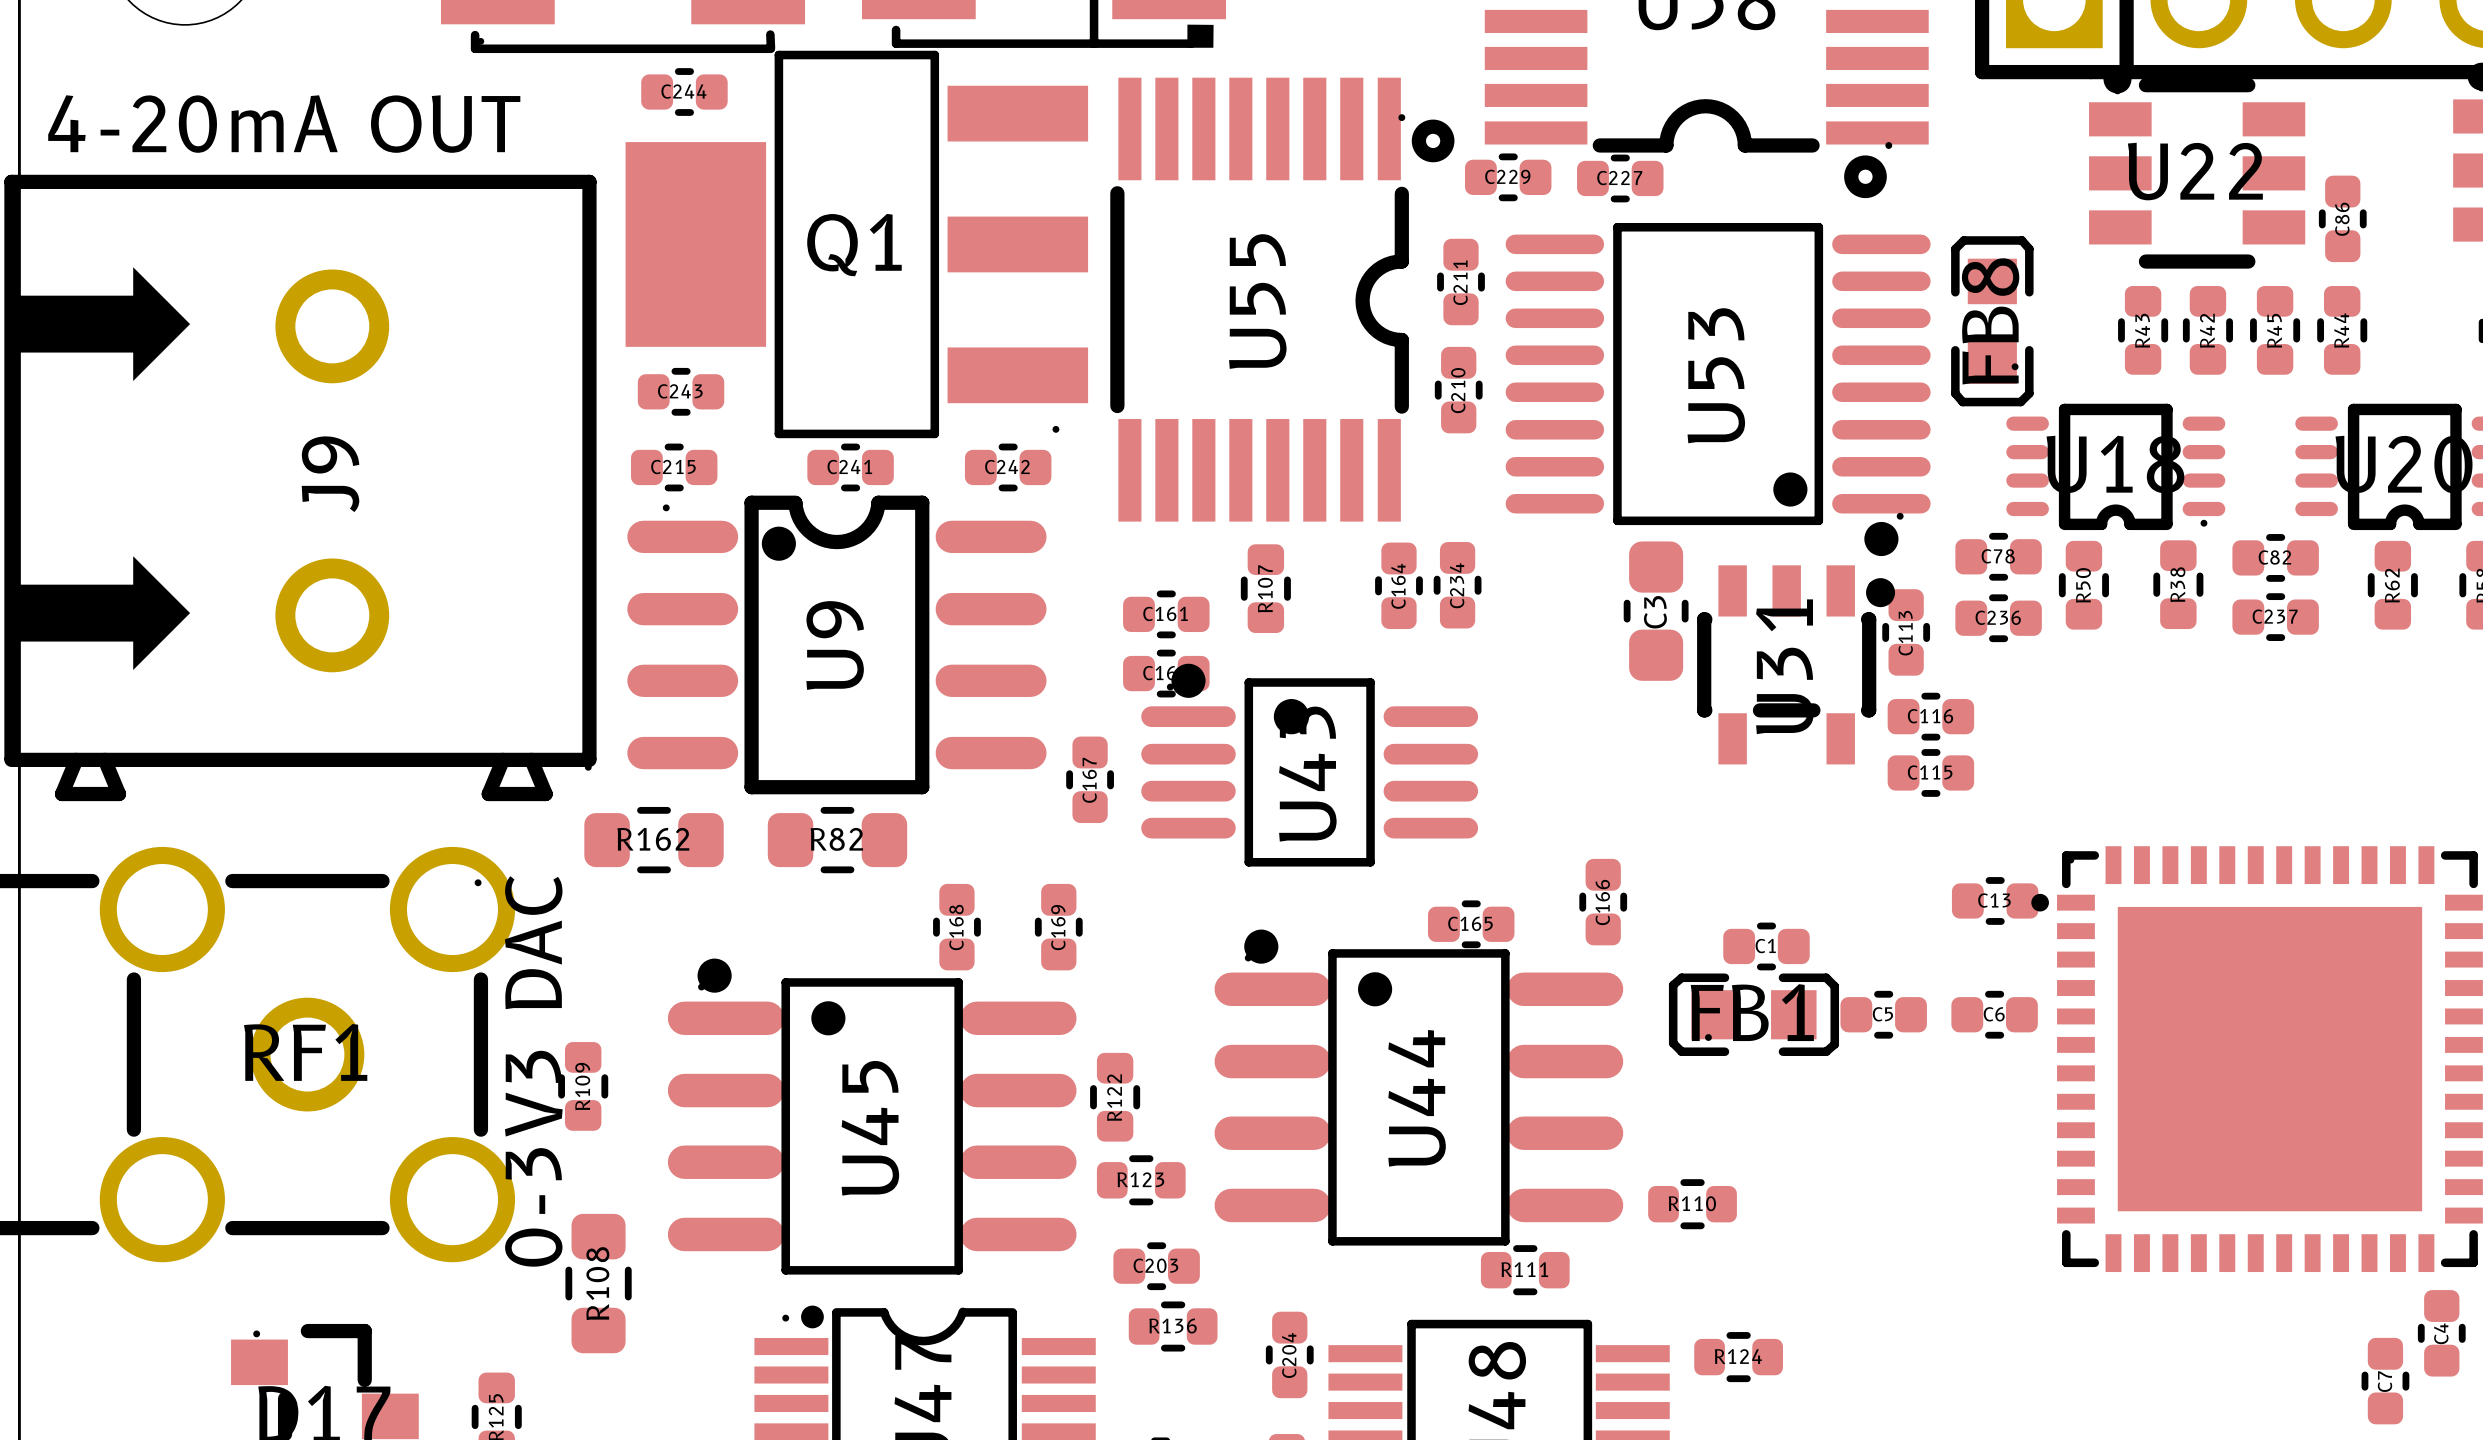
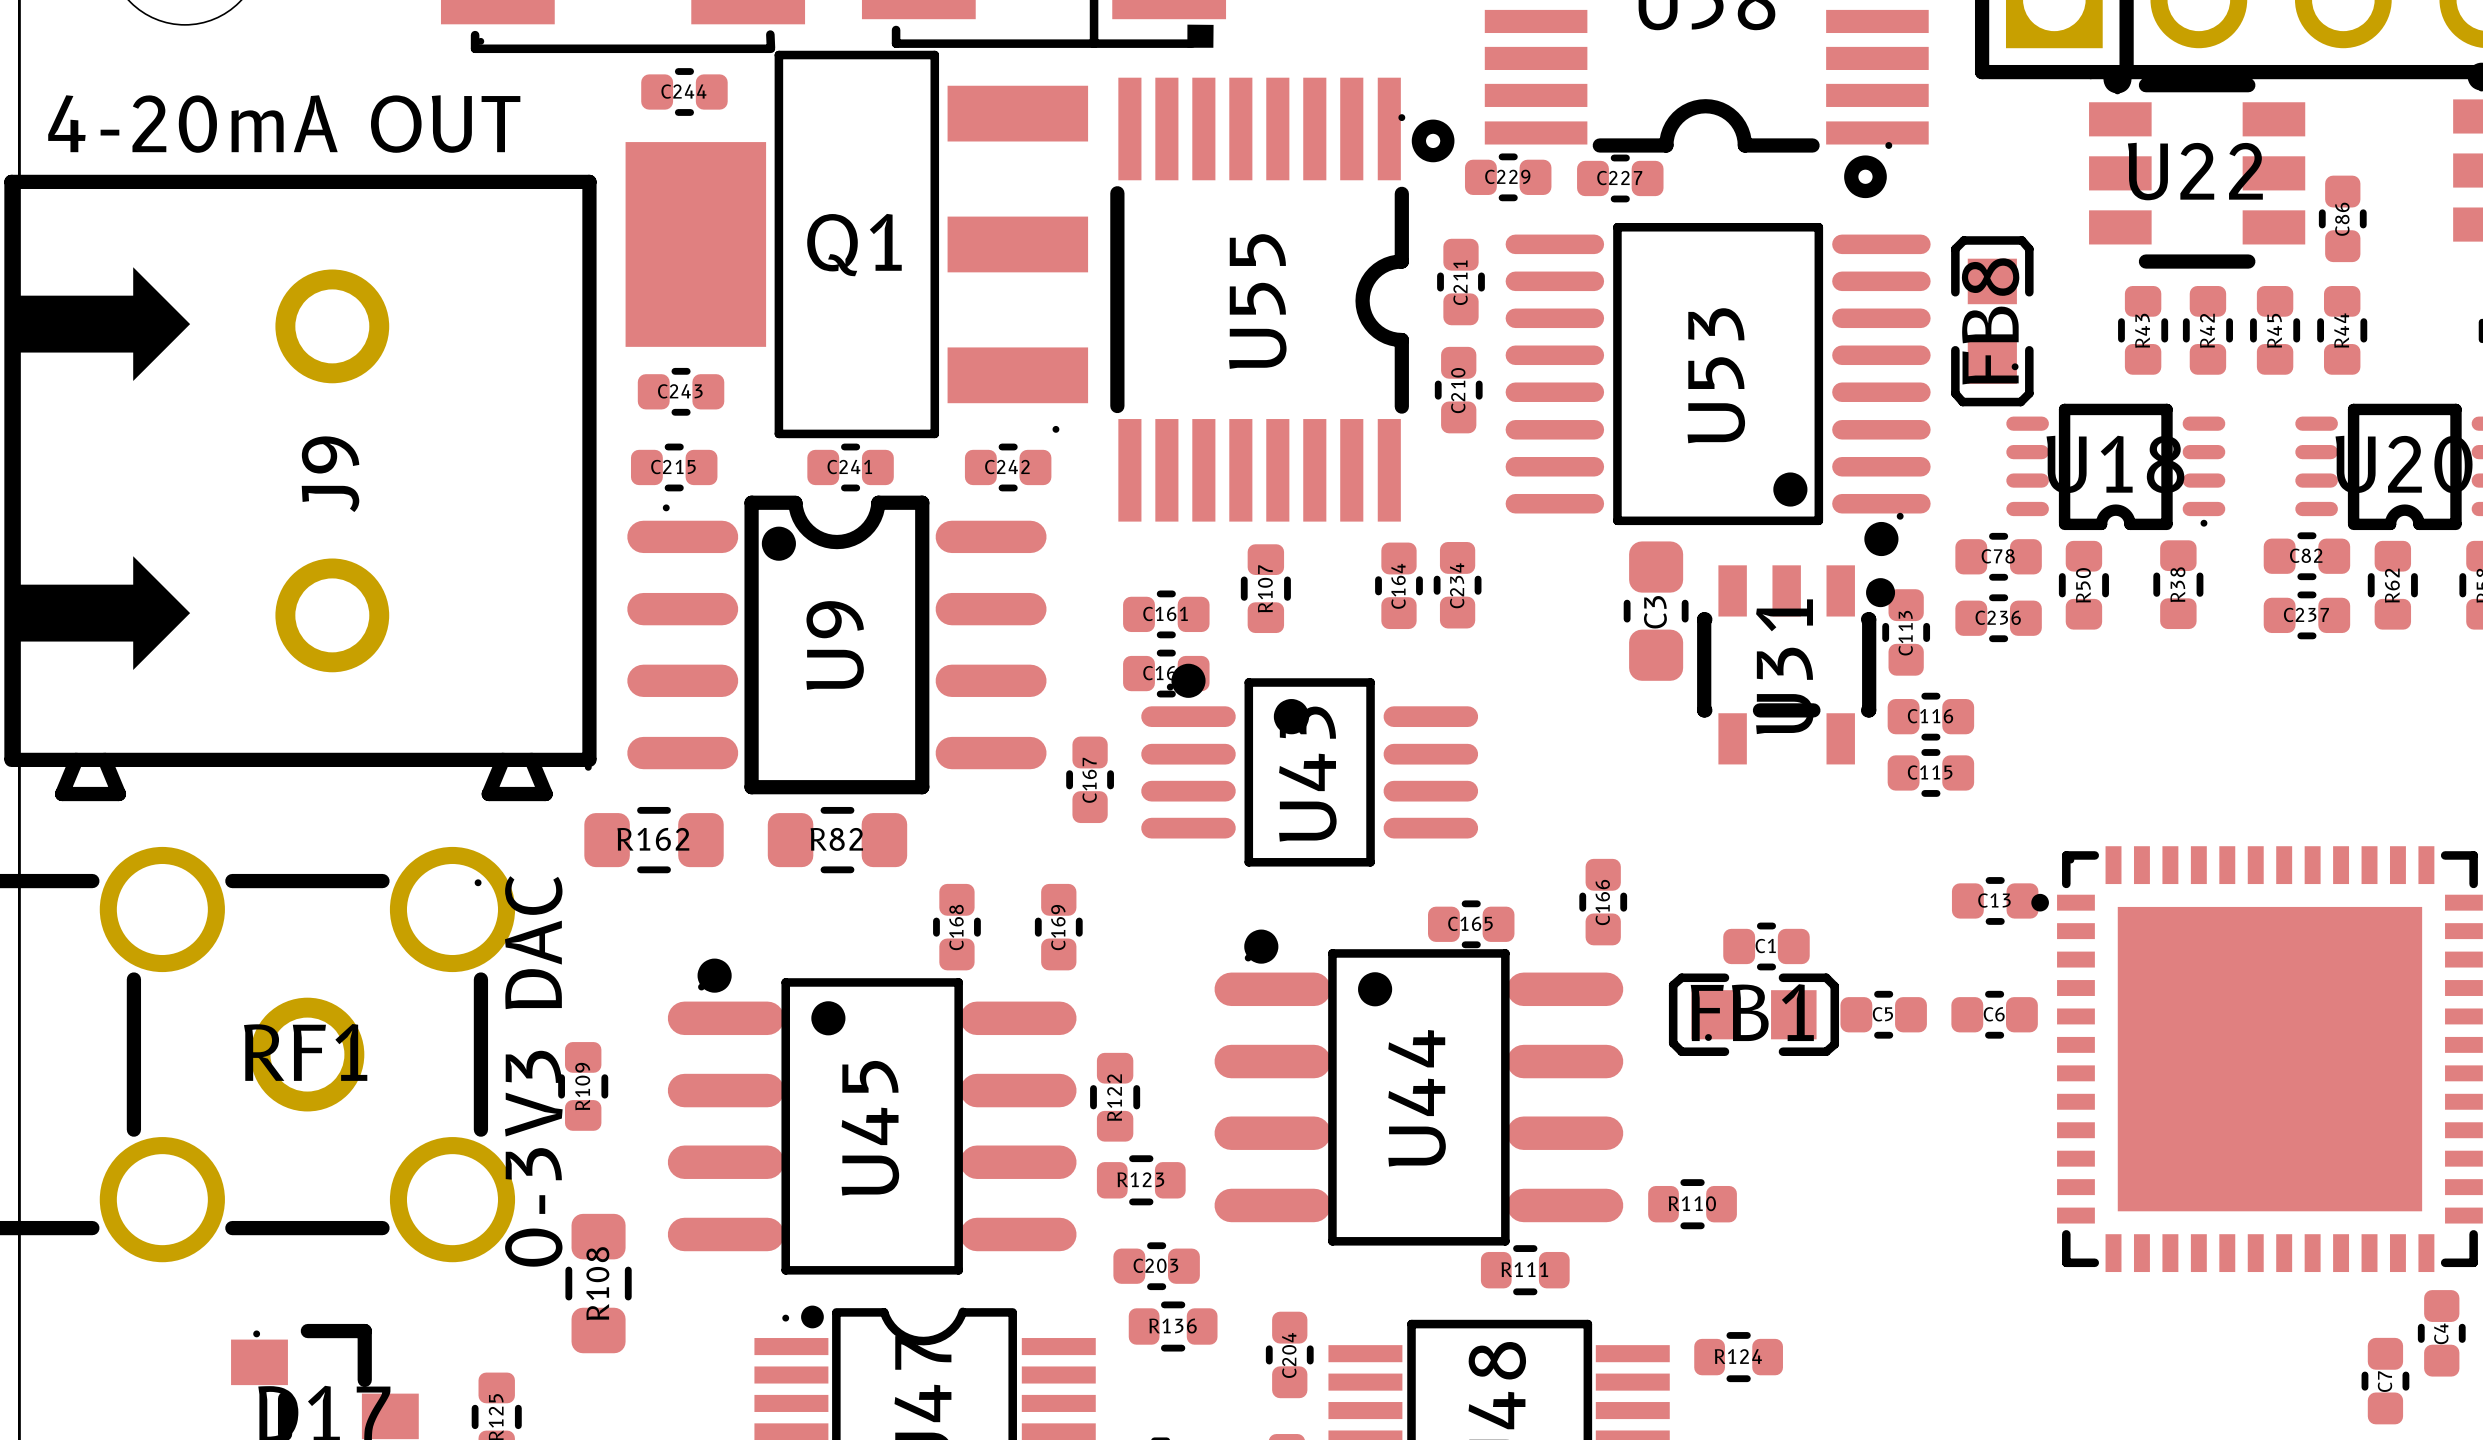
C82 position: (2275, 557) -> (2306, 556)
C237 position: (2275, 617) -> (2306, 615)

